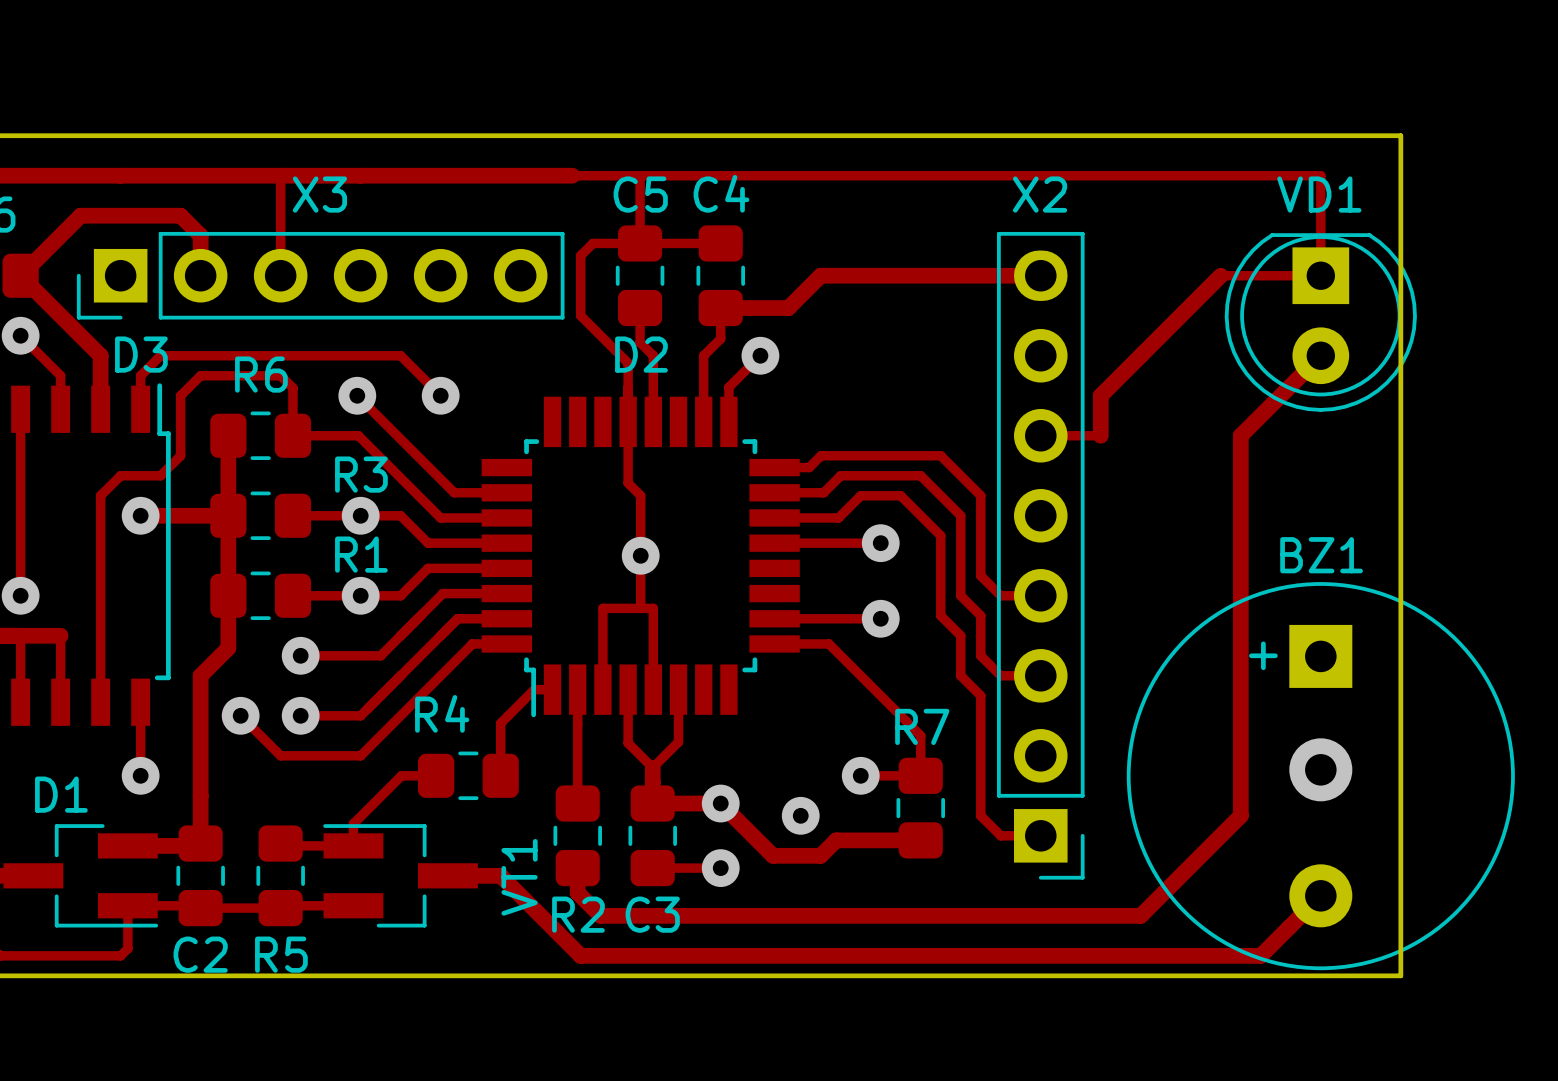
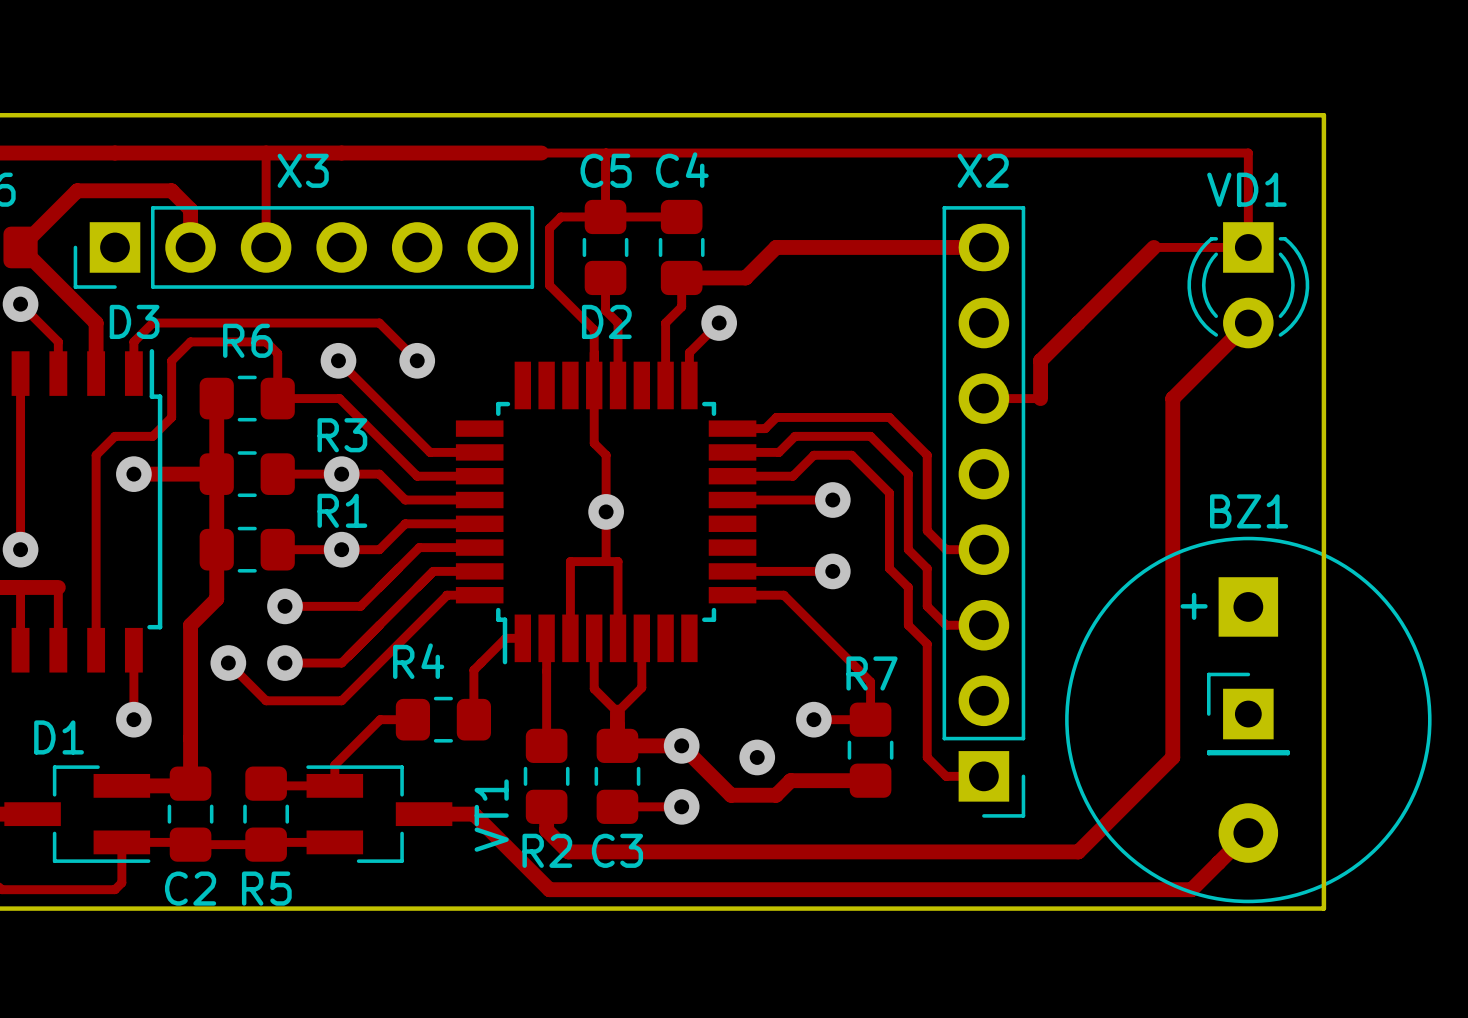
VD1 footprint: [1224, 233, 1417, 412] -> [1187, 222, 1310, 349]
part: none -> (1248, 714)
via: (1320, 769) -> none

